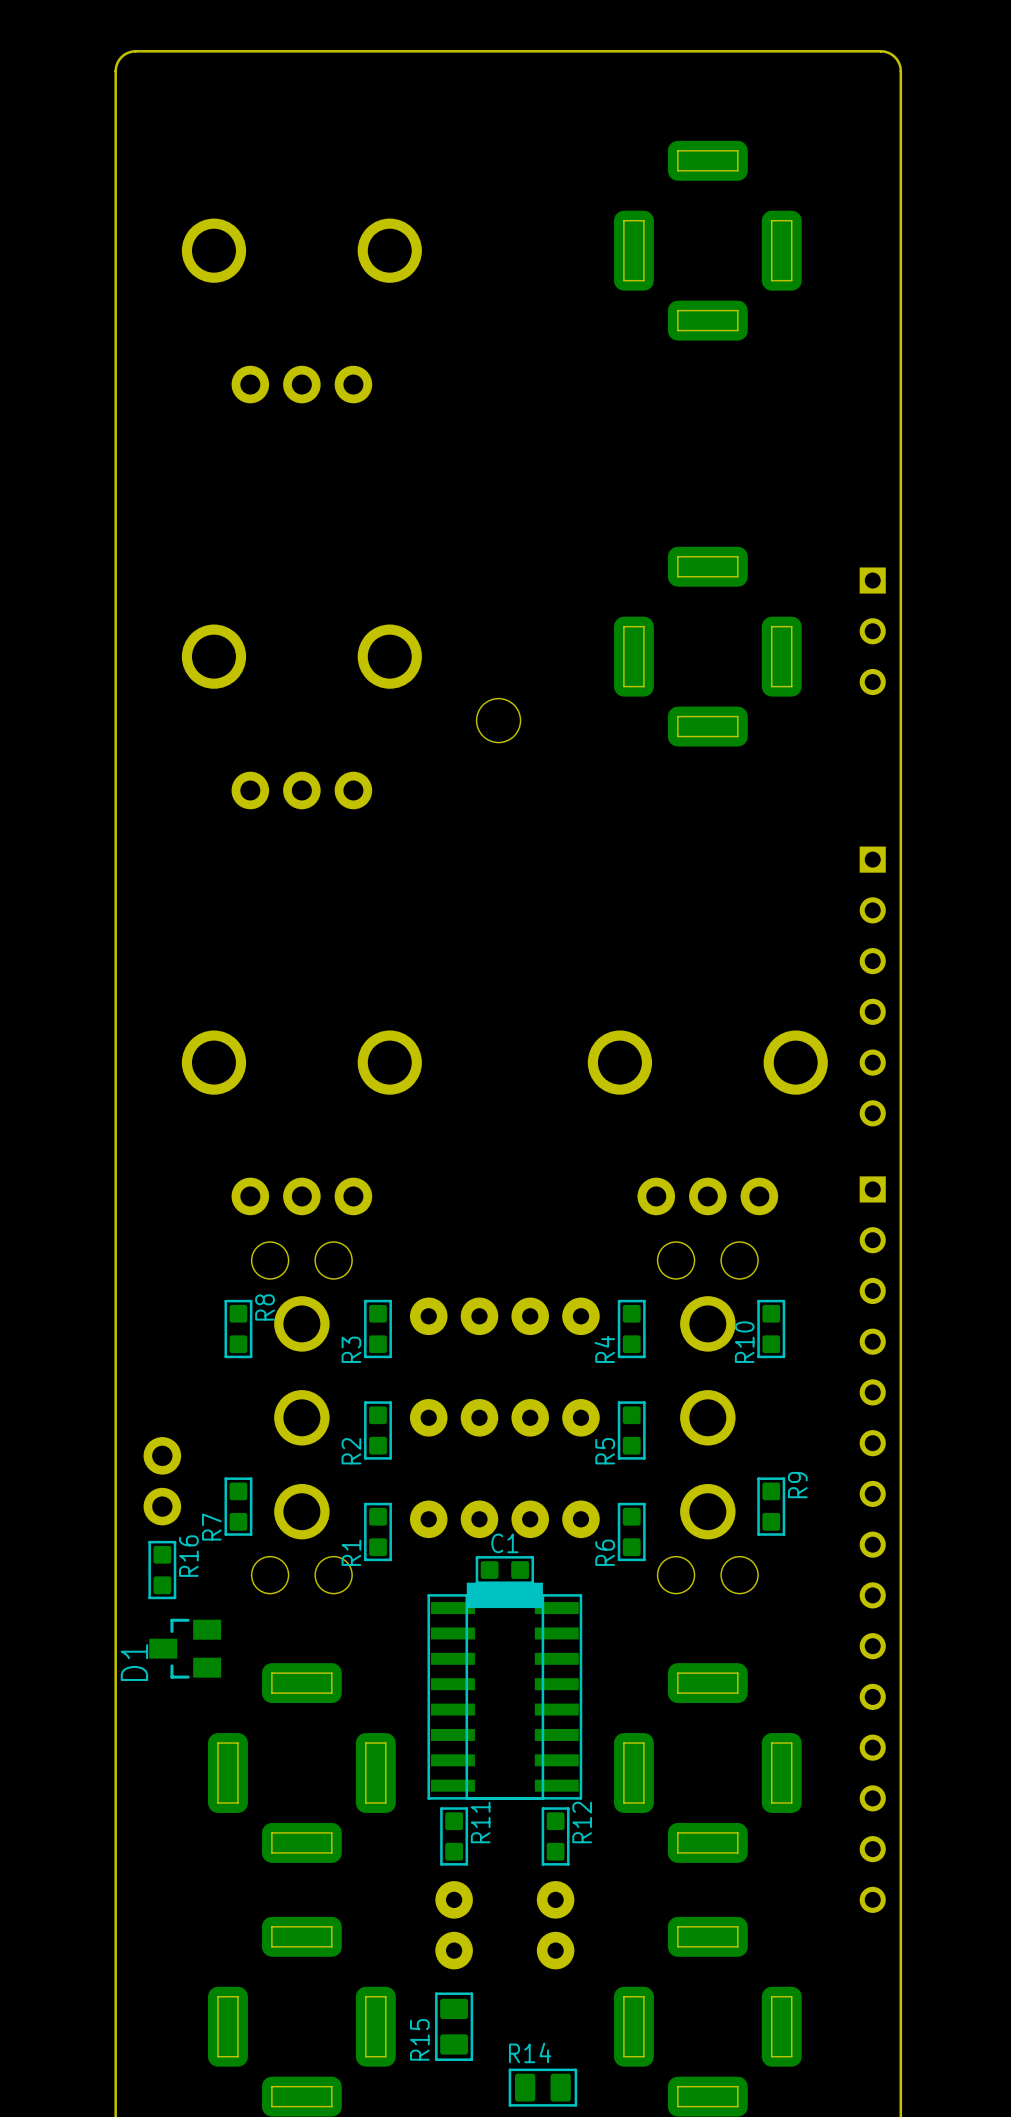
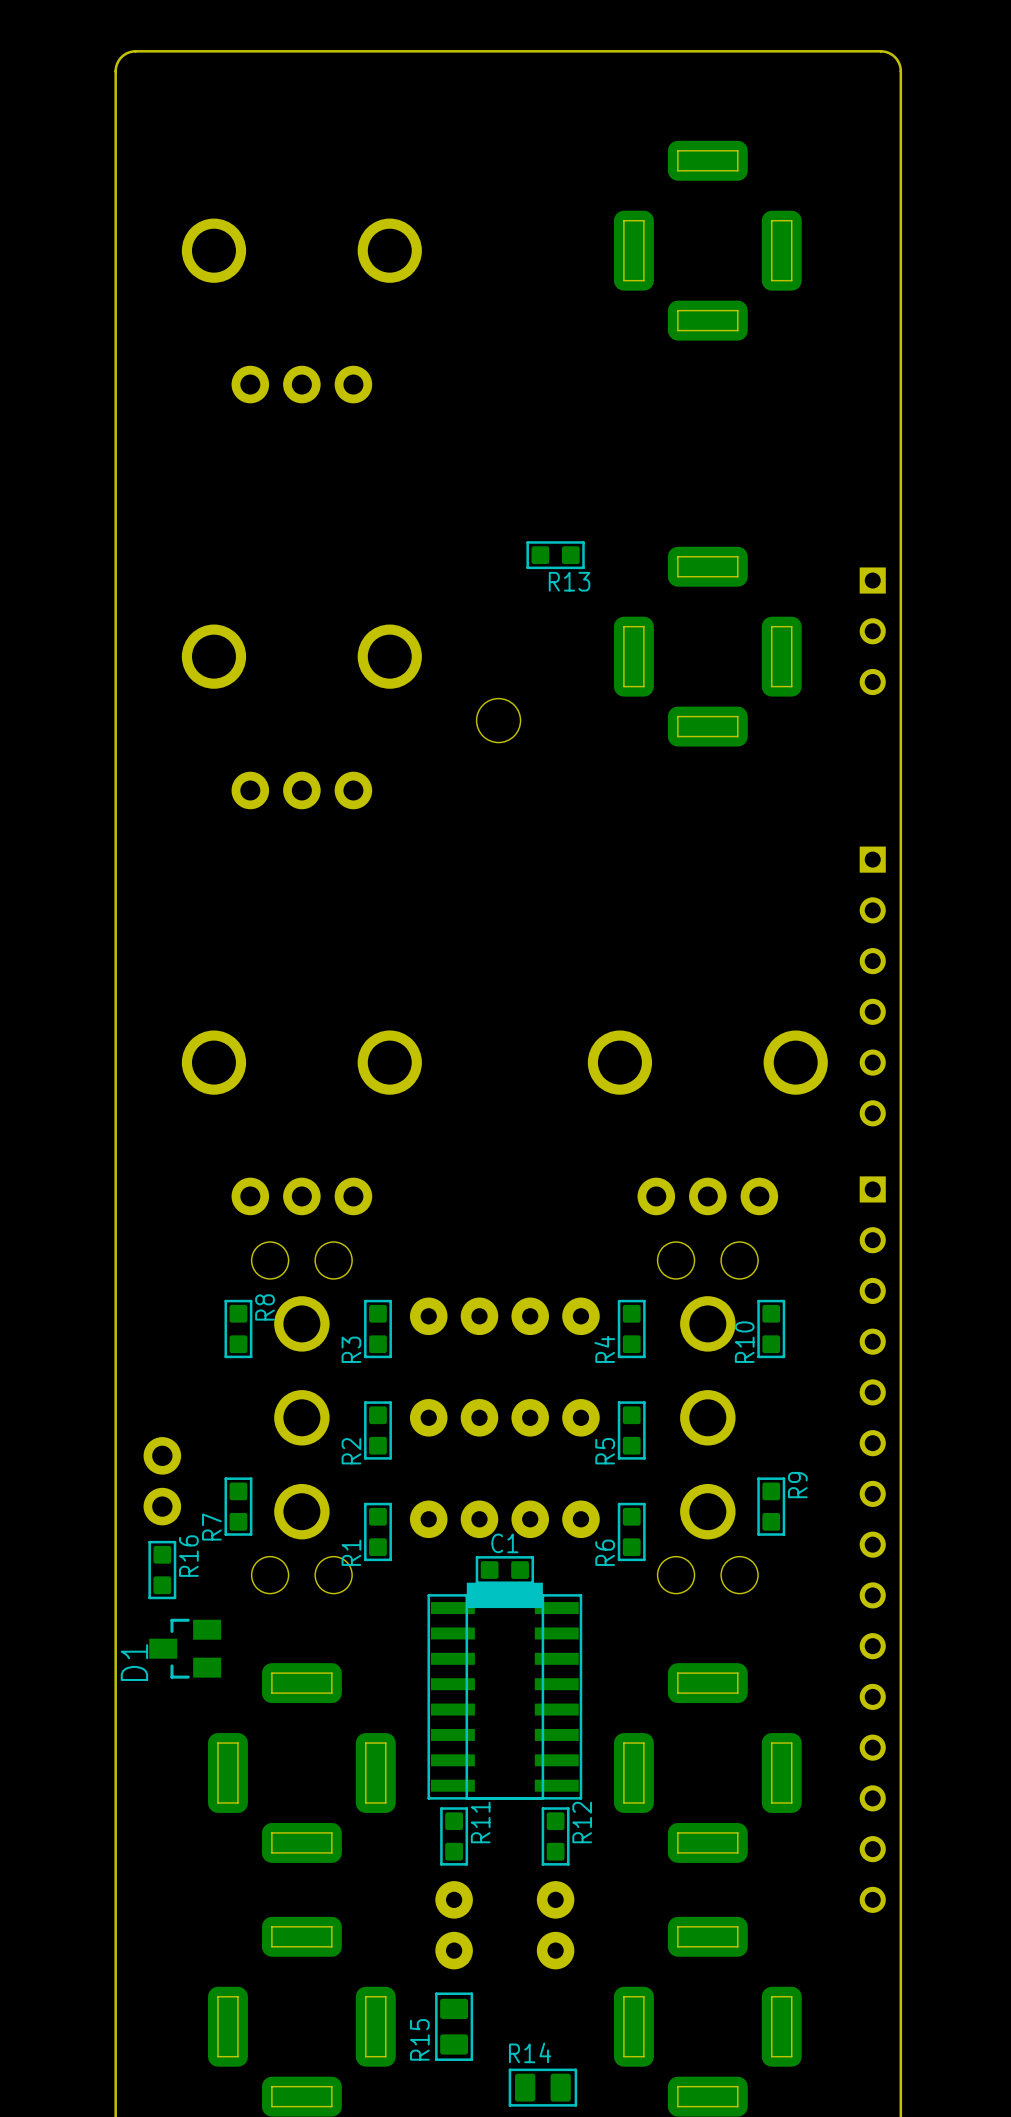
R13: none -> (555, 555)

